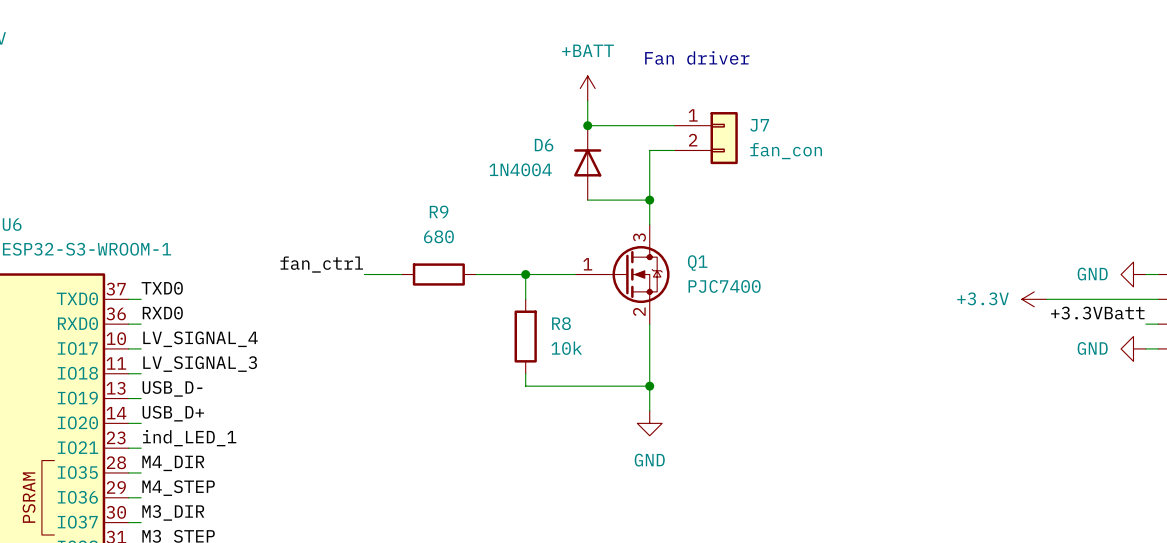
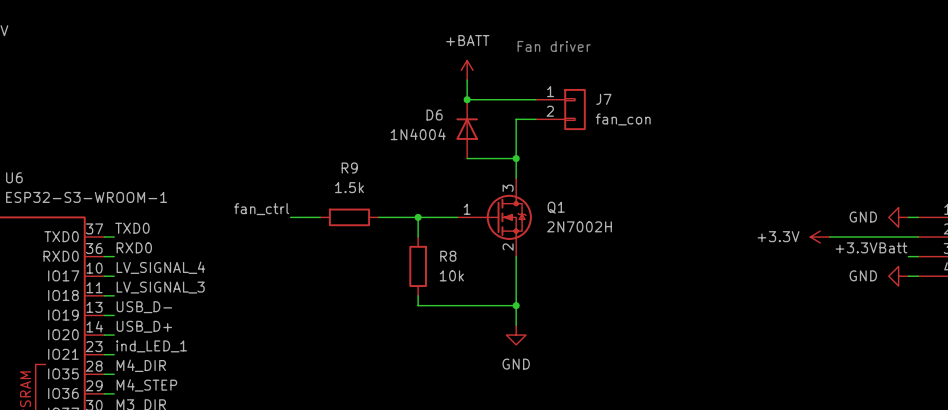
R9 value: 680 (438, 236) -> 1.5k (349, 187)
Q1 value: PJC7400 (724, 286) -> 2N7002H (579, 226)

